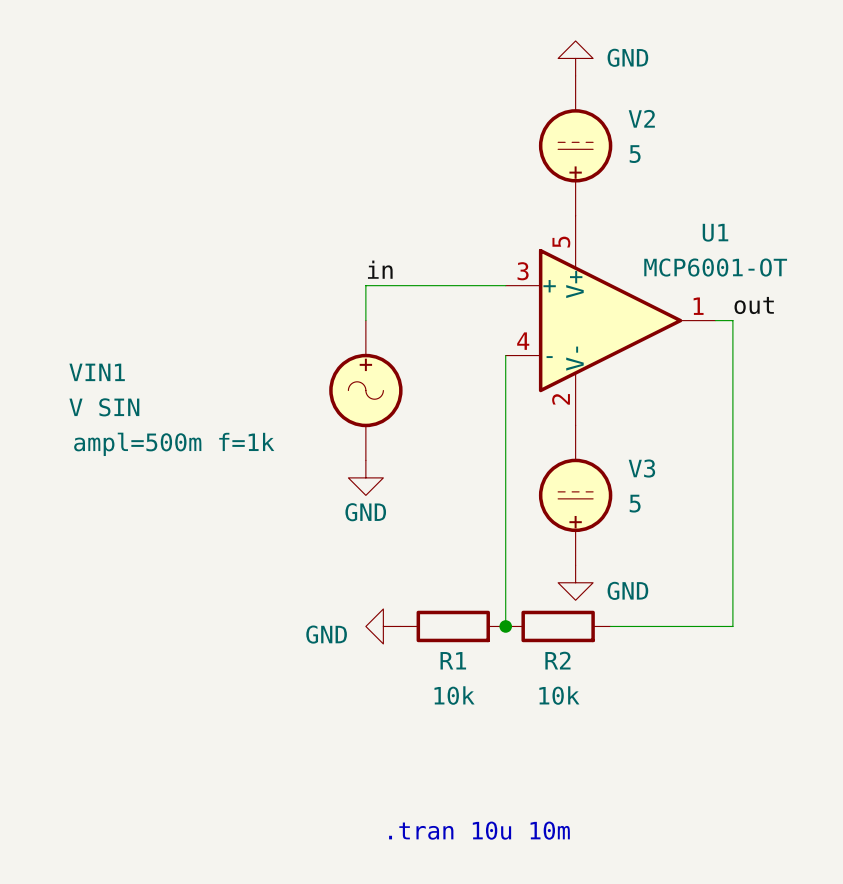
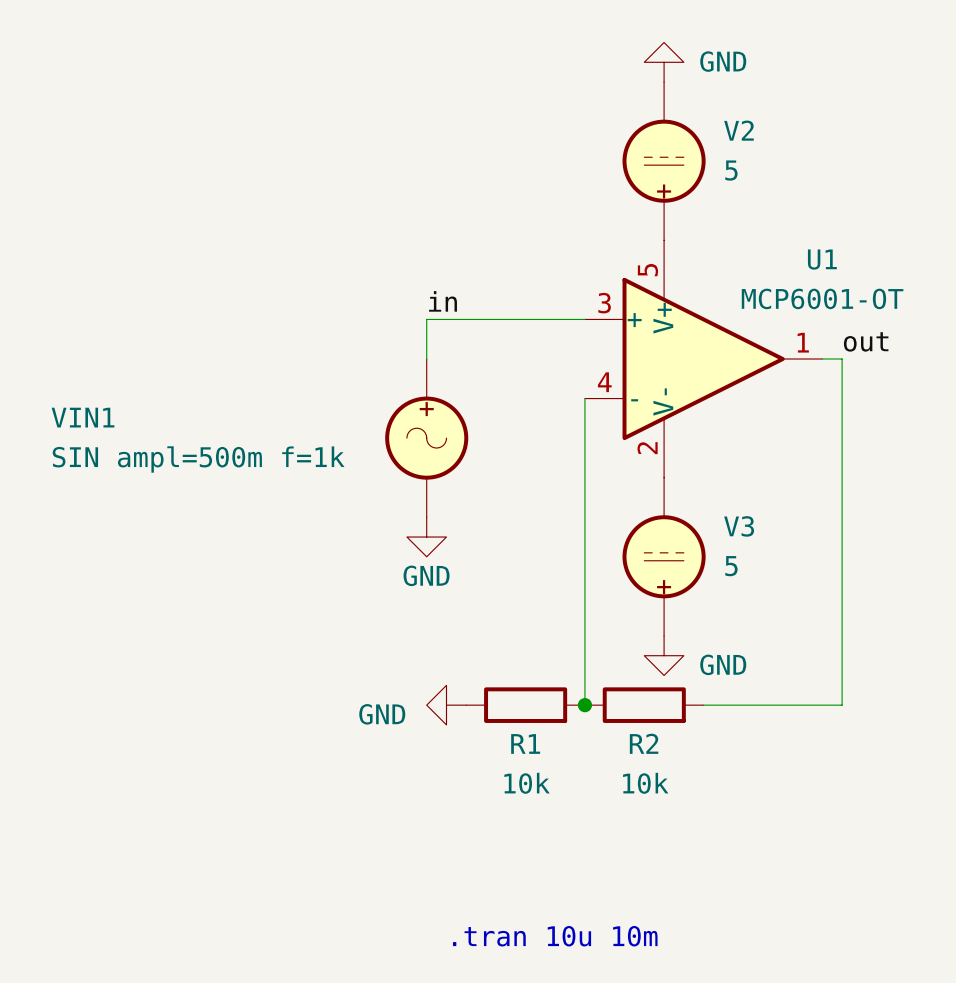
VIN1 name position: VIN1 (97, 372) -> VIN1 (83, 417)
VIN1 value: V SIN (104, 407) -> SIN ampl=500m f=1k (198, 459)
VIN1 text: ampl=500m f=1k (174, 444) -> none

